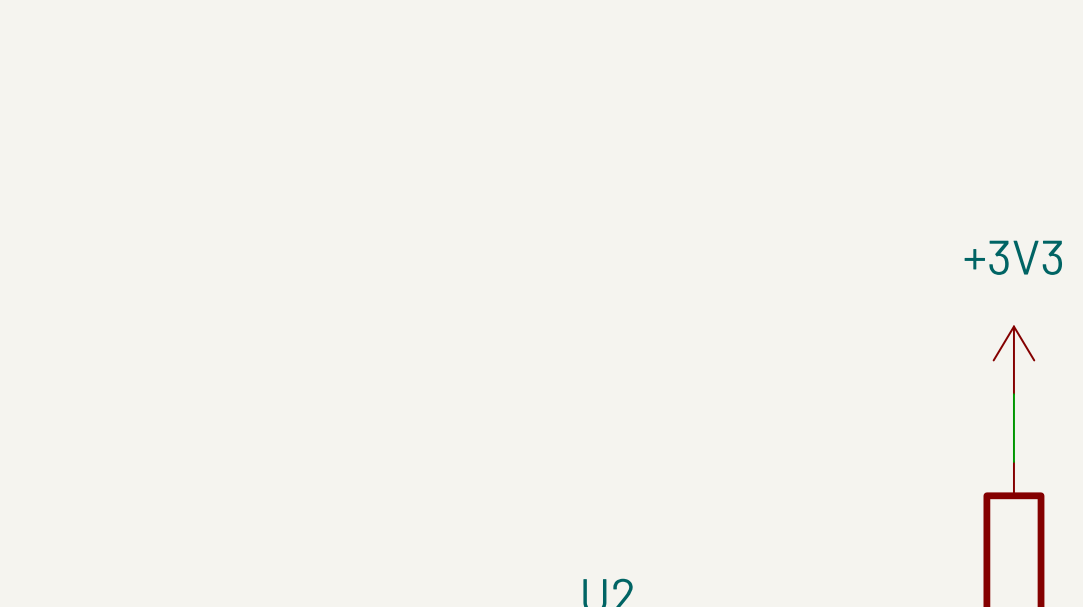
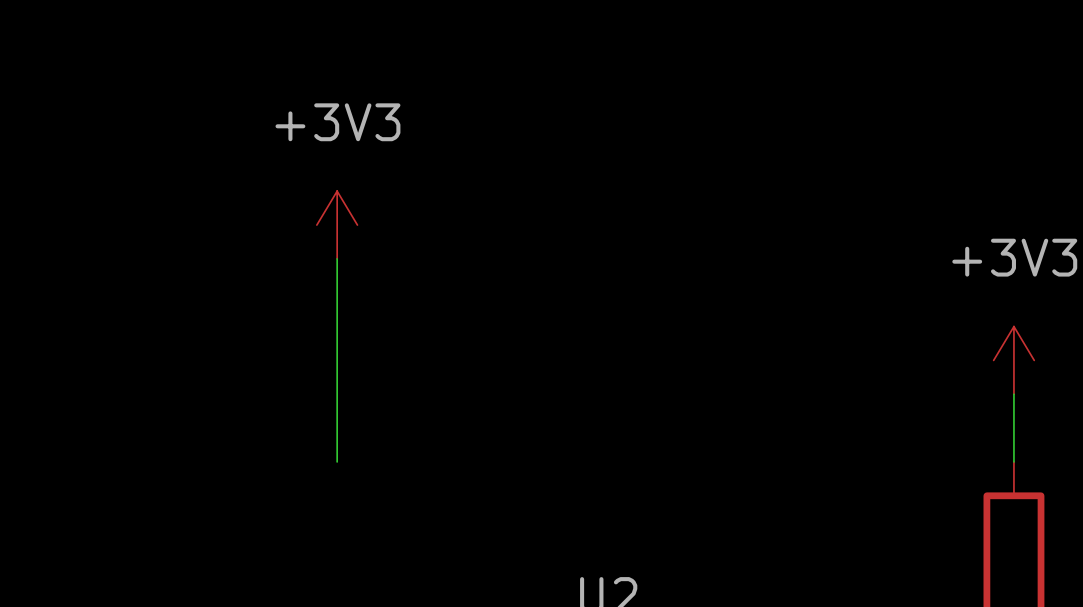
power symbol: none -> +3V3 (337, 225)
wire: none -> (337, 258) (337, 461)

